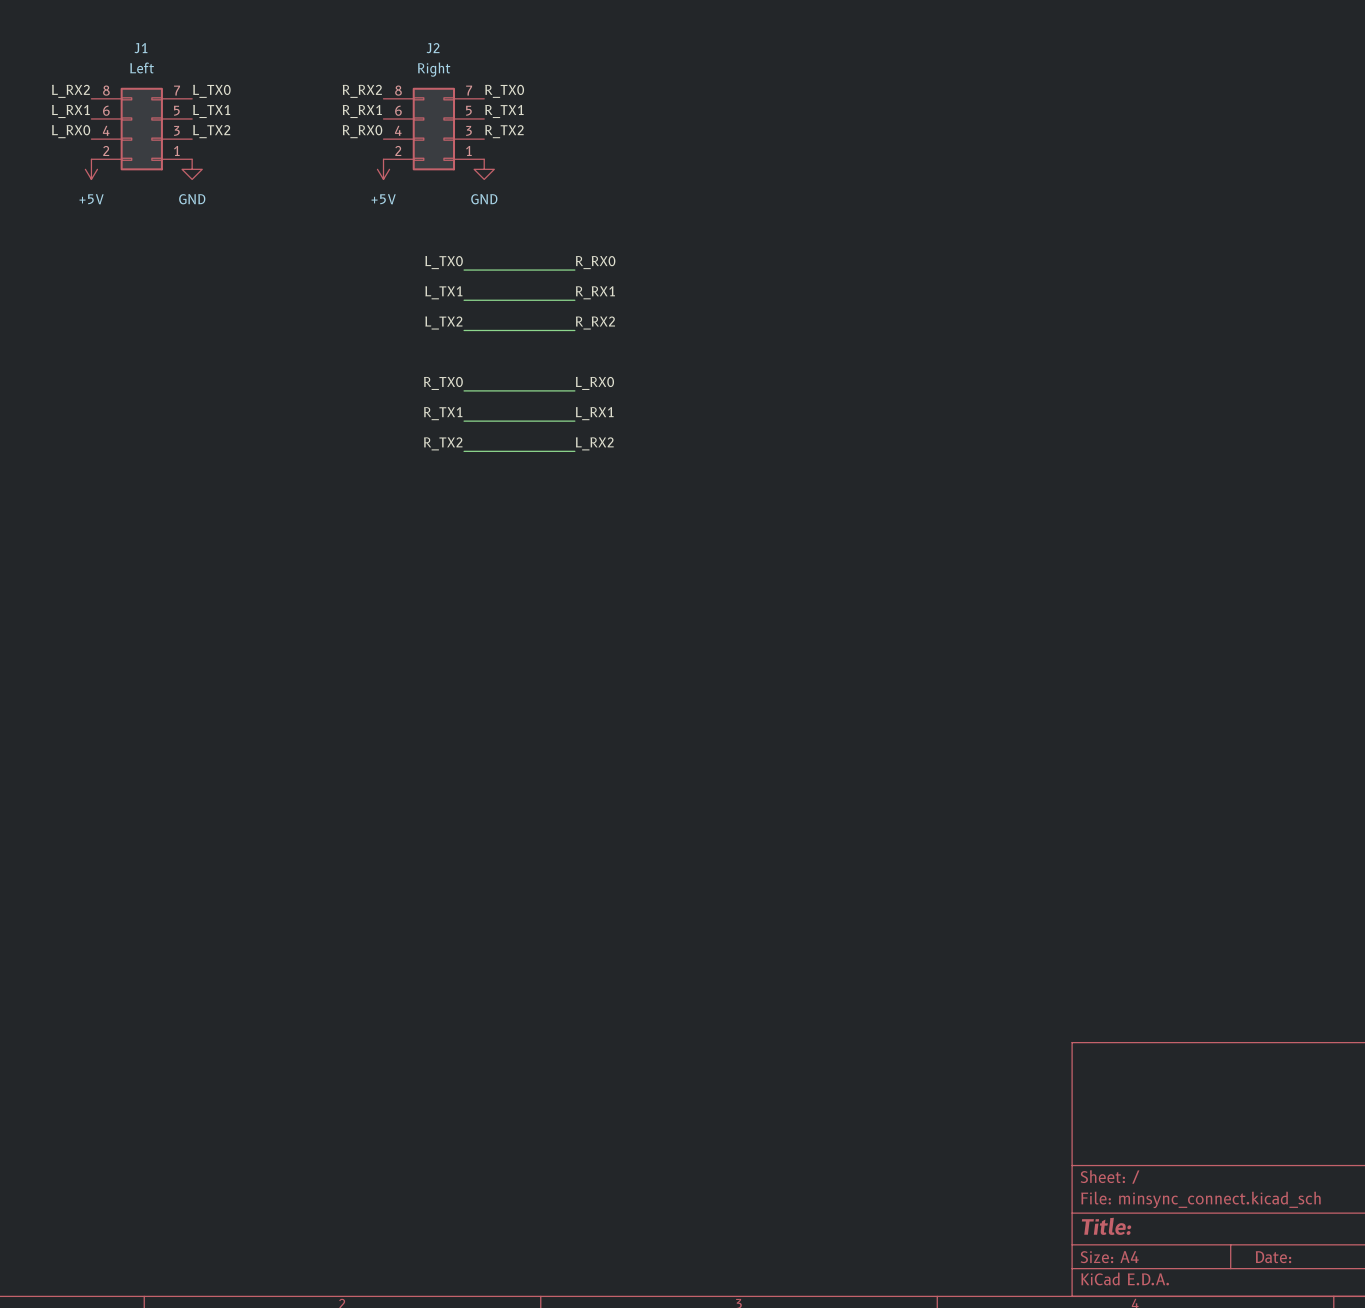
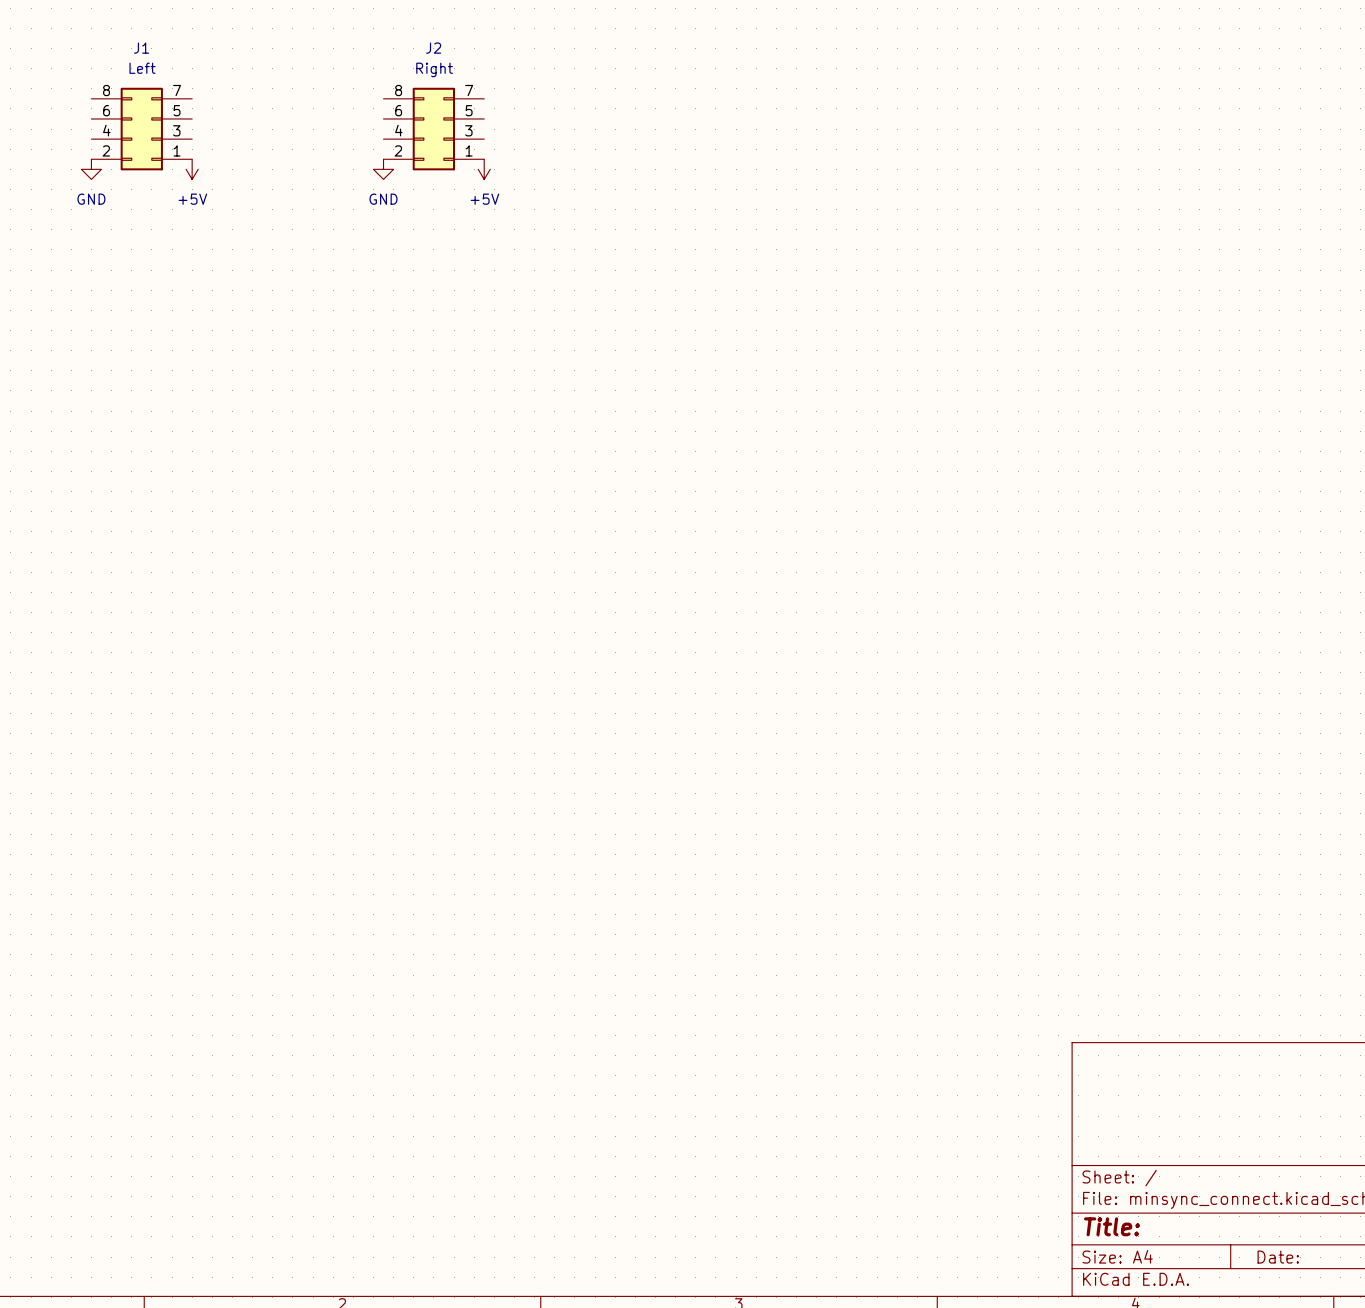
label: L_RX2 (70, 91) -> none
label: L_TX0 (211, 91) -> none
label: R_RX2 (362, 91) -> none
label: R_TX0 (504, 91) -> none
label: L_RX1 (70, 111) -> none
label: L_TX1 (211, 111) -> none
label: R_RX1 (362, 111) -> none
label: R_TX1 (504, 111) -> none
label: L_RX0 (71, 131) -> none
label: L_TX2 (211, 131) -> none
label: R_RX0 (362, 131) -> none
label: R_TX2 (504, 131) -> none
power symbol: +5V (91, 169) -> GND (91, 169)
power symbol: GND (192, 169) -> +5V (192, 169)
power symbol: +5V (383, 169) -> GND (383, 169)
power symbol: GND (484, 169) -> +5V (484, 169)
label: L_TX0 (444, 262) -> none
label: R_RX0 (595, 262) -> none
wire: (464, 270) (574, 270) -> none
label: L_TX1 (443, 292) -> none
label: R_RX1 (595, 292) -> none
wire: (464, 300) (574, 300) -> none
label: L_TX2 (443, 323) -> none
label: R_RX2 (595, 323) -> none
wire: (464, 330) (574, 330) -> none
label: R_TX0 (443, 383) -> none
label: L_RX0 (594, 383) -> none
wire: (464, 390) (574, 390) -> none
label: R_TX1 (443, 413) -> none
label: L_RX1 (594, 413) -> none
wire: (464, 421) (574, 421) -> none
label: R_TX2 (443, 443) -> none
label: L_RX2 (594, 443) -> none
wire: (464, 451) (574, 451) -> none

